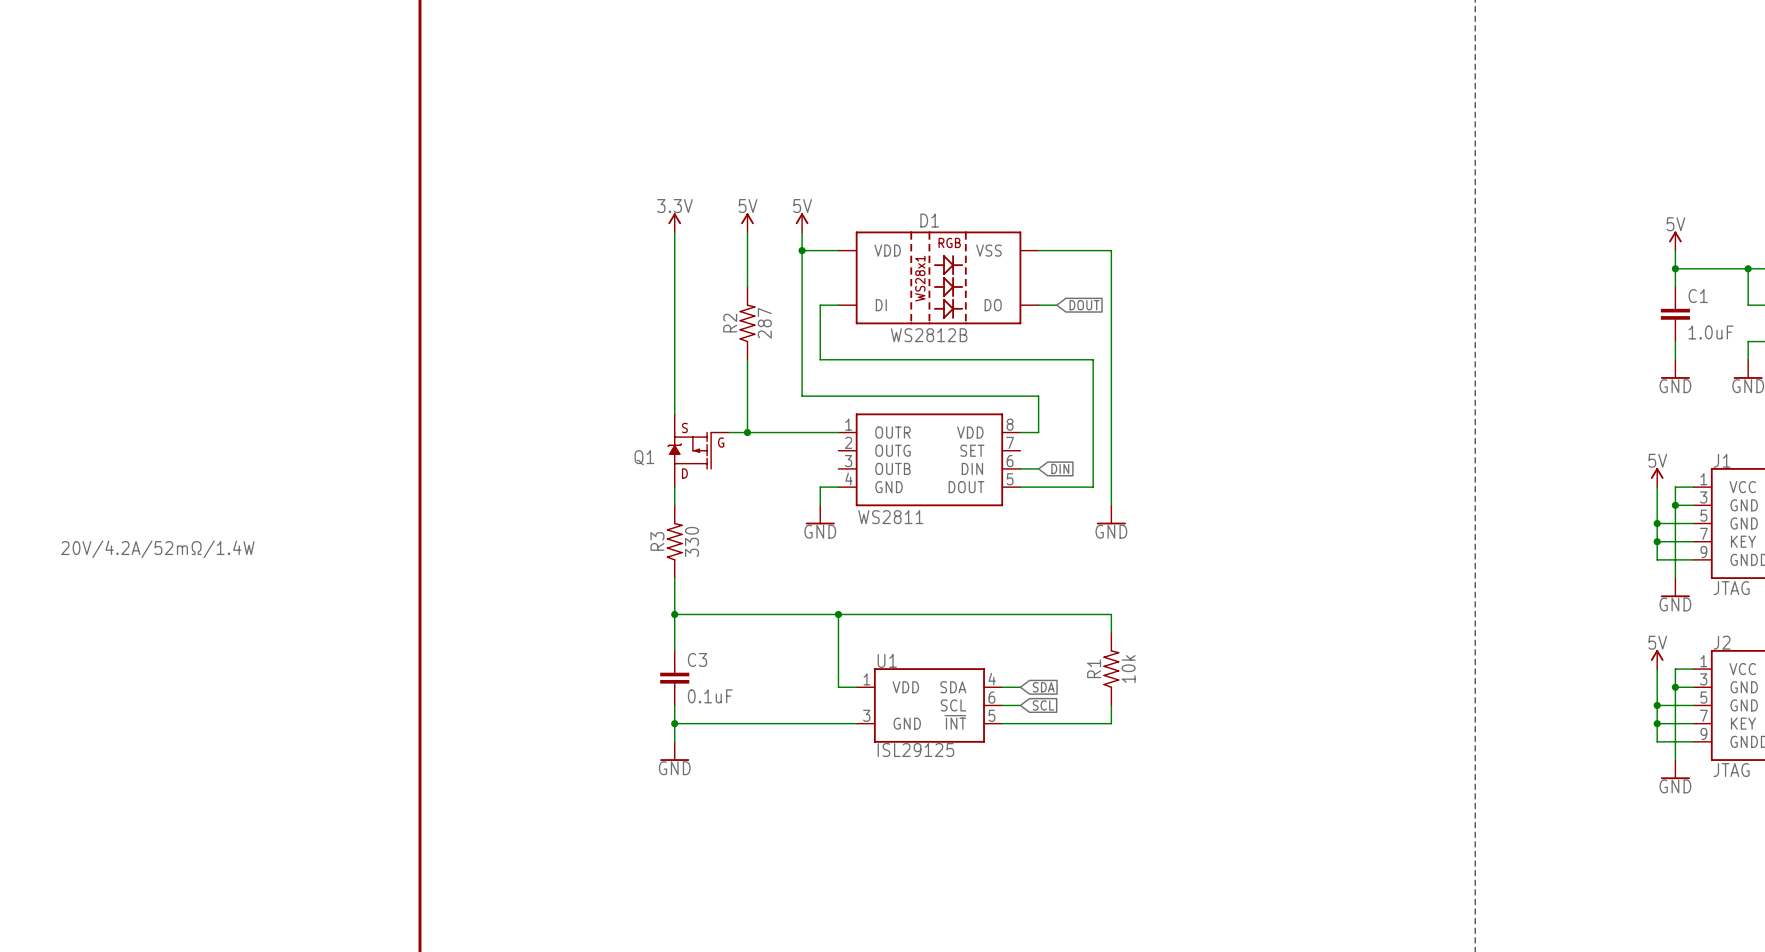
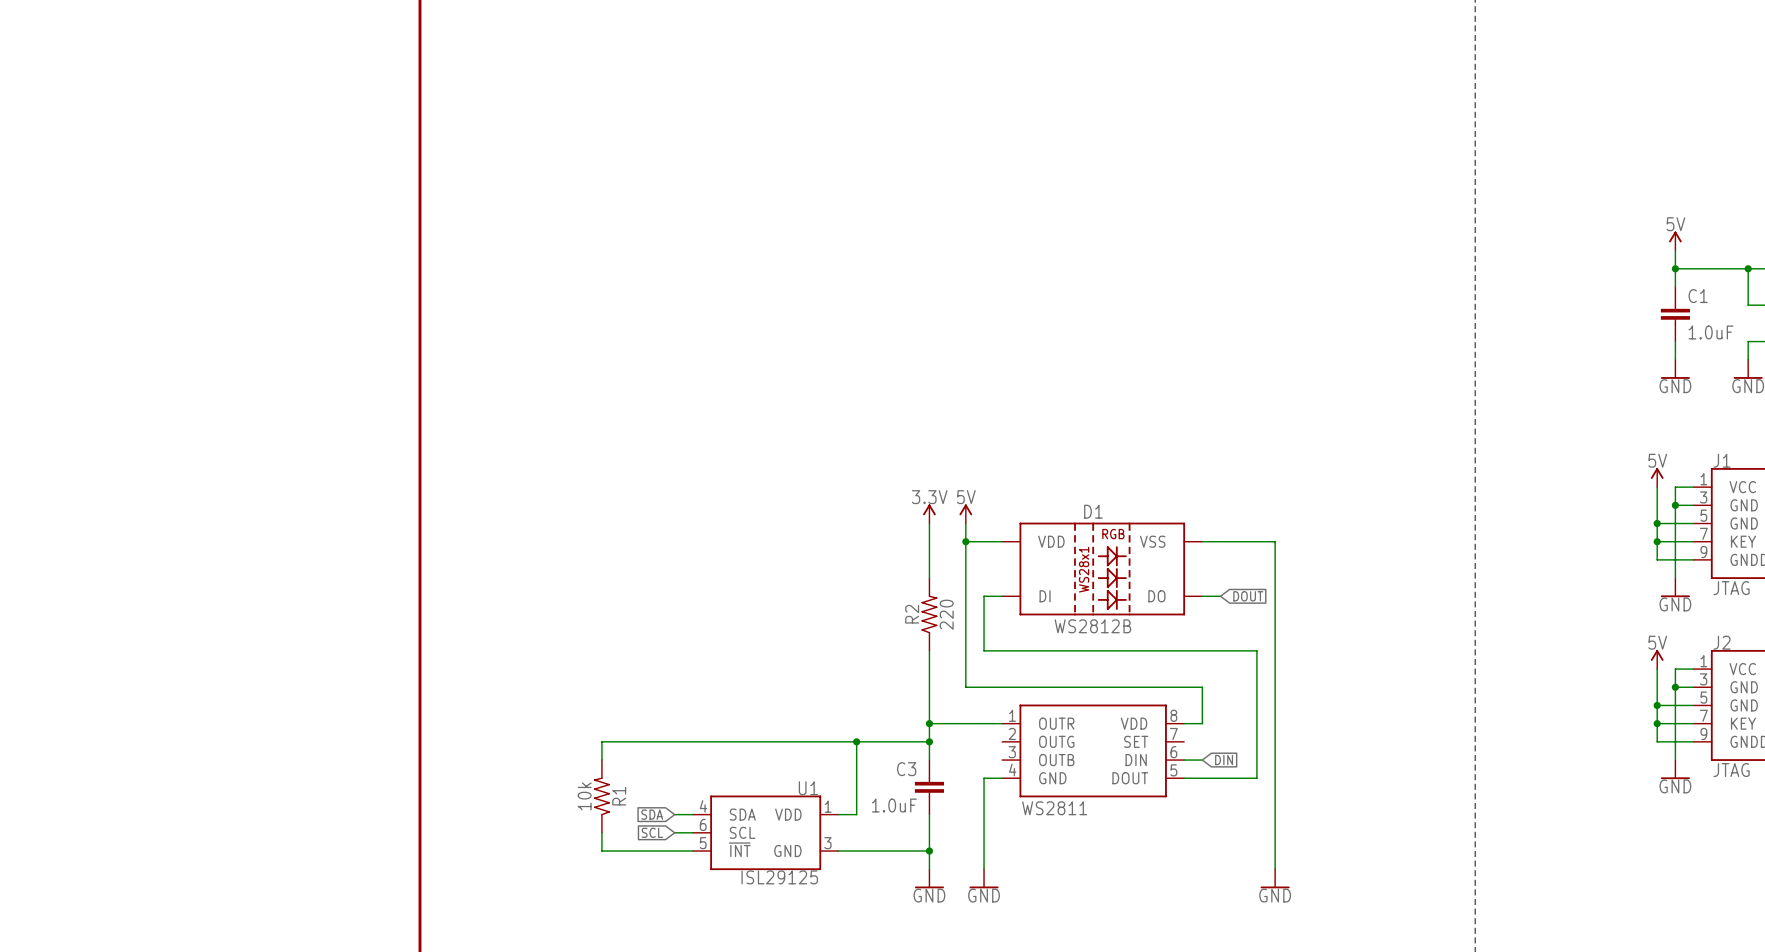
power symbol: 3.3V (674, 222) -> none
power symbol: 5V (747, 222) -> none
power symbol: 5V (802, 222) -> none
wire: (674, 232) (674, 414) -> none
wire: (747, 232) (747, 286) -> none
wire: (802, 232) (802, 396) (1038, 396) (1038, 432) (1020, 432) -> none
wire: (802, 250) (838, 250) -> none
junction: (802, 250) -> none
wire: (1038, 250) (1111, 250) (1111, 505) -> none
D1 position: (938, 277) -> (1102, 569)
wire: (838, 305) (820, 305) (820, 359) (1093, 359) (1093, 487) (1020, 487) -> none
wire: (1038, 305) (1056, 305) -> none
global label: DOUT (1084, 305) -> none
R2 position: (747, 323) -> (929, 614)
R2 value: 287 (764, 323) -> 220 (946, 614)
wire: (747, 359) (747, 432) -> none
wire: (729, 432) (838, 432) -> none
junction: (747, 432) -> none
Q1: 20V/4.2A/52mΩ/1.4W (698, 450) -> none
part: (929, 459) -> none
wire: (1020, 468) (1038, 468) -> none
global label: DIN (1060, 468) -> none
wire: (674, 487) (674, 505) -> none
wire: (838, 487) (820, 487) (820, 505) -> none
power symbol: none -> 3.3V (929, 513)
power symbol: none -> 5V (965, 513)
power symbol: GND (820, 514) -> none
power symbol: GND (1111, 514) -> none
wire: none -> (929, 523) (929, 578)
wire: none -> (965, 523) (965, 687) (1002, 687)
R3: 330 (674, 541) -> none
wire: none -> (965, 541) (1002, 541)
junction: none -> (965, 541)
wire: none -> (1202, 541) (1275, 541) (1275, 869)
wire: (674, 578) (674, 650) -> none
wire: none -> (1002, 596) (984, 596) (984, 650) (1256, 650) (1256, 778) (1184, 778)
wire: none -> (1202, 596) (1220, 596)
global label: none -> DOUT (1248, 596)
wire: (674, 614) (1111, 614) (1111, 632) -> none
junction: (674, 614) -> none
wire: (838, 614) (838, 687) (856, 687) -> none
junction: (838, 614) -> none
wire: none -> (929, 650) (929, 760)
C3 name position: C3 (697, 659) -> C3 (906, 769)
R1 flip: as is (1111, 669) -> left-right (601, 796)
R1 position: (1111, 669) -> (601, 796)
C3 position: (674, 678) -> (929, 787)
wire: none -> (1020, 687) (1202, 687) (1202, 723) (1184, 723)
global label: SDA (1043, 687) -> none
C3 value: 0.1uF (710, 696) -> 1.0uF (894, 805)
wire: (674, 705) (674, 741) -> none
U1 flip: as is (929, 705) -> left-right (765, 832)
U1 position: (929, 705) -> (765, 832)
wire: (1002, 705) (1020, 705) -> none
global label: SCL (1043, 705) -> none
wire: (1111, 705) (1111, 723) (1002, 723) -> (929, 723) (1002, 723)
wire: (674, 723) (856, 723) -> none
junction: (674, 723) -> none
junction: none -> (929, 723)
wire: none -> (856, 741) (856, 814) (838, 814)
junction: none -> (856, 741)
wire: none -> (929, 741) (601, 741) (601, 760)
junction: none -> (929, 741)
part: none -> (1093, 750)
power symbol: GND (674, 751) -> none
wire: none -> (1184, 760) (1202, 760)
global label: none -> DIN (1224, 760)
wire: none -> (1002, 778) (984, 778) (984, 869)
global label: none -> SDA (652, 814)
wire: none -> (674, 814) (692, 814)
wire: none -> (929, 814) (929, 869)
wire: none -> (601, 832) (601, 851) (692, 851)
global label: none -> SCL (652, 832)
wire: none -> (674, 832) (692, 832)
wire: none -> (838, 851) (929, 851)
junction: none -> (929, 851)
power symbol: none -> GND (929, 878)
power symbol: none -> GND (984, 878)
power symbol: none -> GND (1275, 878)

